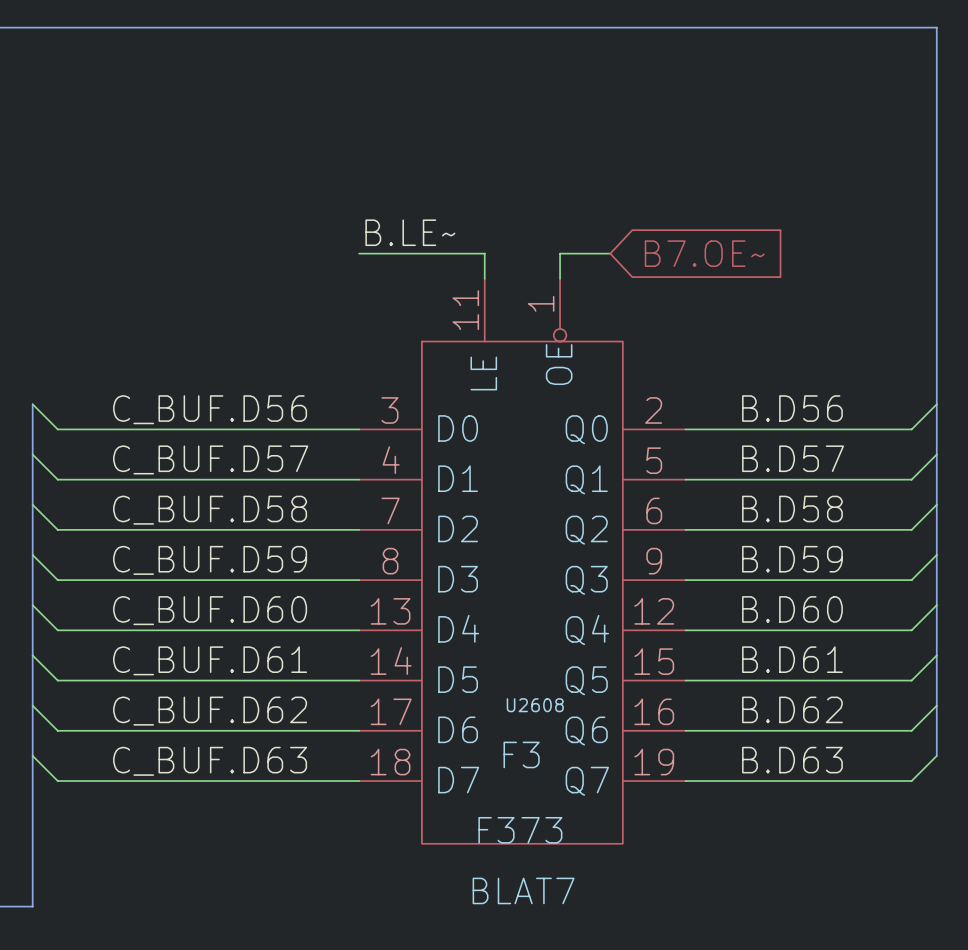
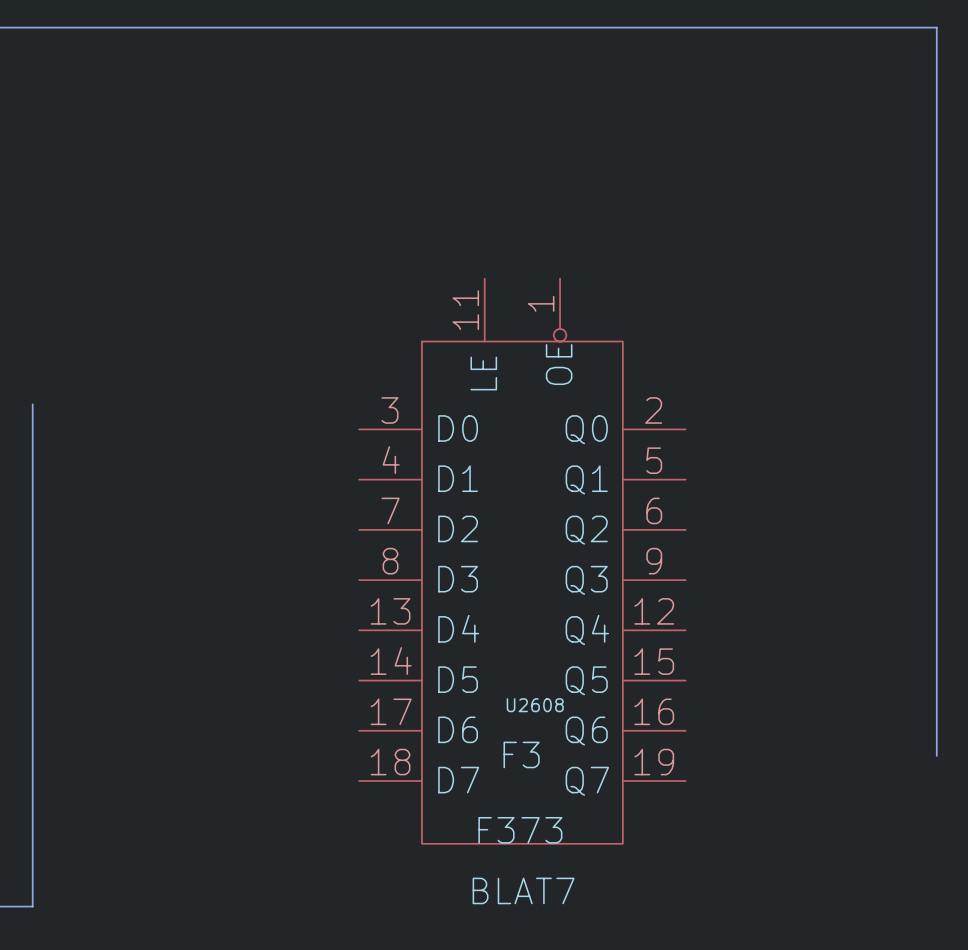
label: B.LE~ (410, 232) -> none
wire: (359, 253) (484, 253) (484, 278) -> none
wire: (610, 253) (560, 253) (560, 278) -> none
global label: B7.OE~ (704, 253) -> none
wire: (32, 404) (57, 429) (359, 429) -> none
wire: (936, 404) (911, 429) (685, 429) -> none
label: B.D56 (792, 408) -> none
label: C_BUF.D56 (210, 409) -> none
wire: (32, 454) (57, 479) (359, 479) -> none
wire: (936, 454) (911, 479) (685, 479) -> none
label: B.D57 (793, 458) -> none
label: C_BUF.D57 (210, 459) -> none
wire: (32, 504) (57, 529) (359, 529) -> none
wire: (936, 504) (911, 529) (685, 529) -> none
label: B.D58 (792, 508) -> none
label: C_BUF.D58 (210, 510) -> none
wire: (32, 554) (57, 580) (359, 580) -> none
wire: (936, 554) (911, 580) (685, 580) -> none
label: B.D59 (792, 559) -> none
label: C_BUF.D59 (210, 560) -> none
wire: (32, 605) (57, 630) (359, 630) -> none
wire: (936, 605) (911, 630) (685, 630) -> none
label: B.D60 (792, 609) -> none
label: C_BUF.D60 (210, 610) -> none
wire: (32, 655) (57, 680) (359, 680) -> none
wire: (936, 655) (911, 680) (685, 680) -> none
label: B.D61 (792, 659) -> none
label: C_BUF.D61 (210, 660) -> none
wire: (32, 705) (57, 730) (359, 730) -> none
wire: (936, 705) (911, 730) (685, 730) -> none
label: B.D62 (792, 709) -> none
label: C_BUF.D62 (210, 711) -> none
wire: (32, 755) (57, 781) (359, 781) -> none
wire: (936, 755) (911, 781) (685, 781) -> none
label: B.D63 (792, 760) -> none
label: C_BUF.D63 (210, 761) -> none

